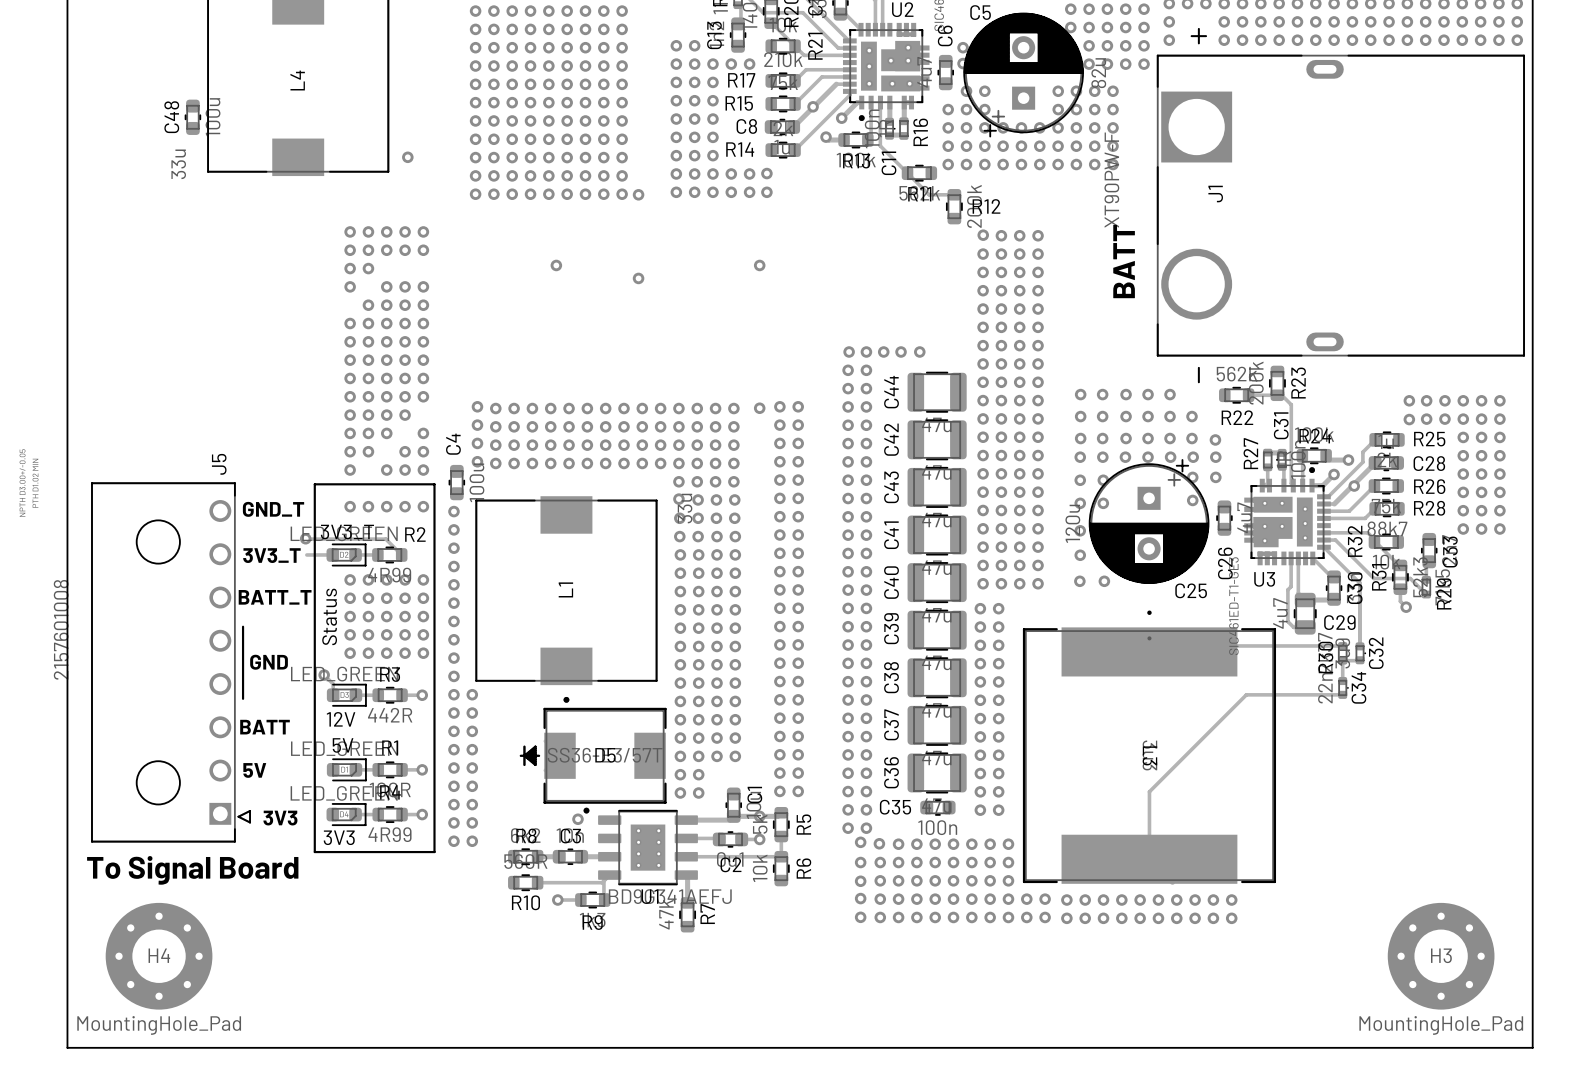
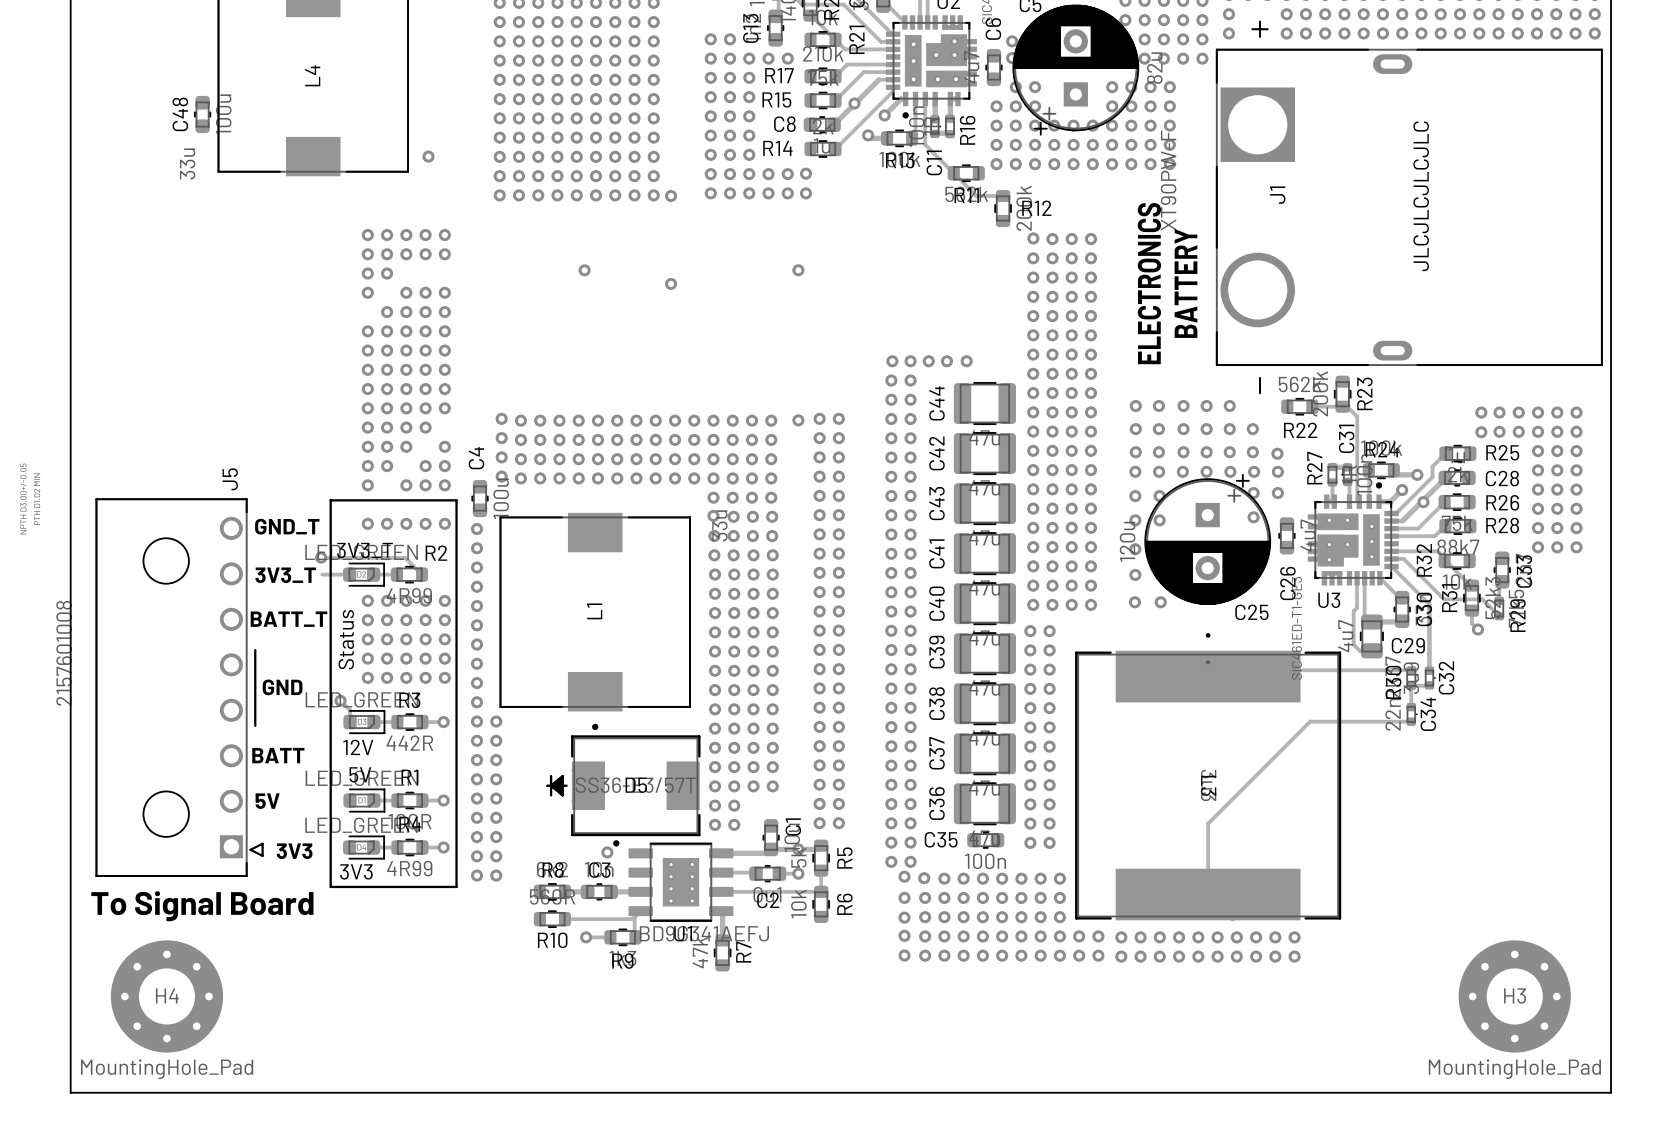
text: none -> JLCJLCJLCJLC (1421, 196)
text: BATT (1124, 261) -> BATTERY (1186, 283)
text: none -> ELECTRONICS (1149, 283)

